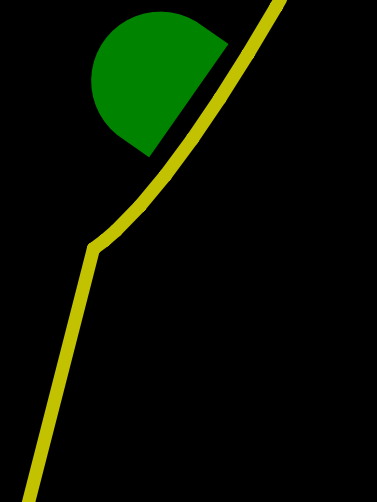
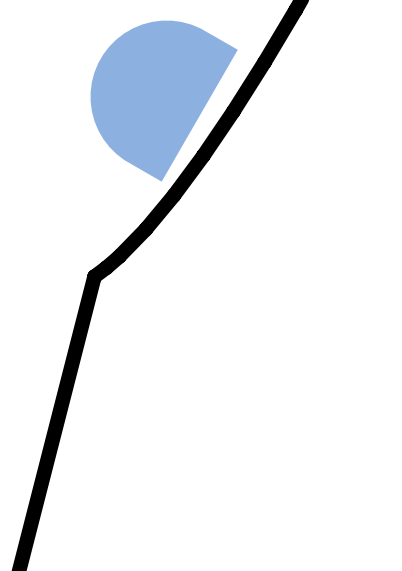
part rotation: 0° (159, 84) -> 5° counterclockwise (164, 101)

